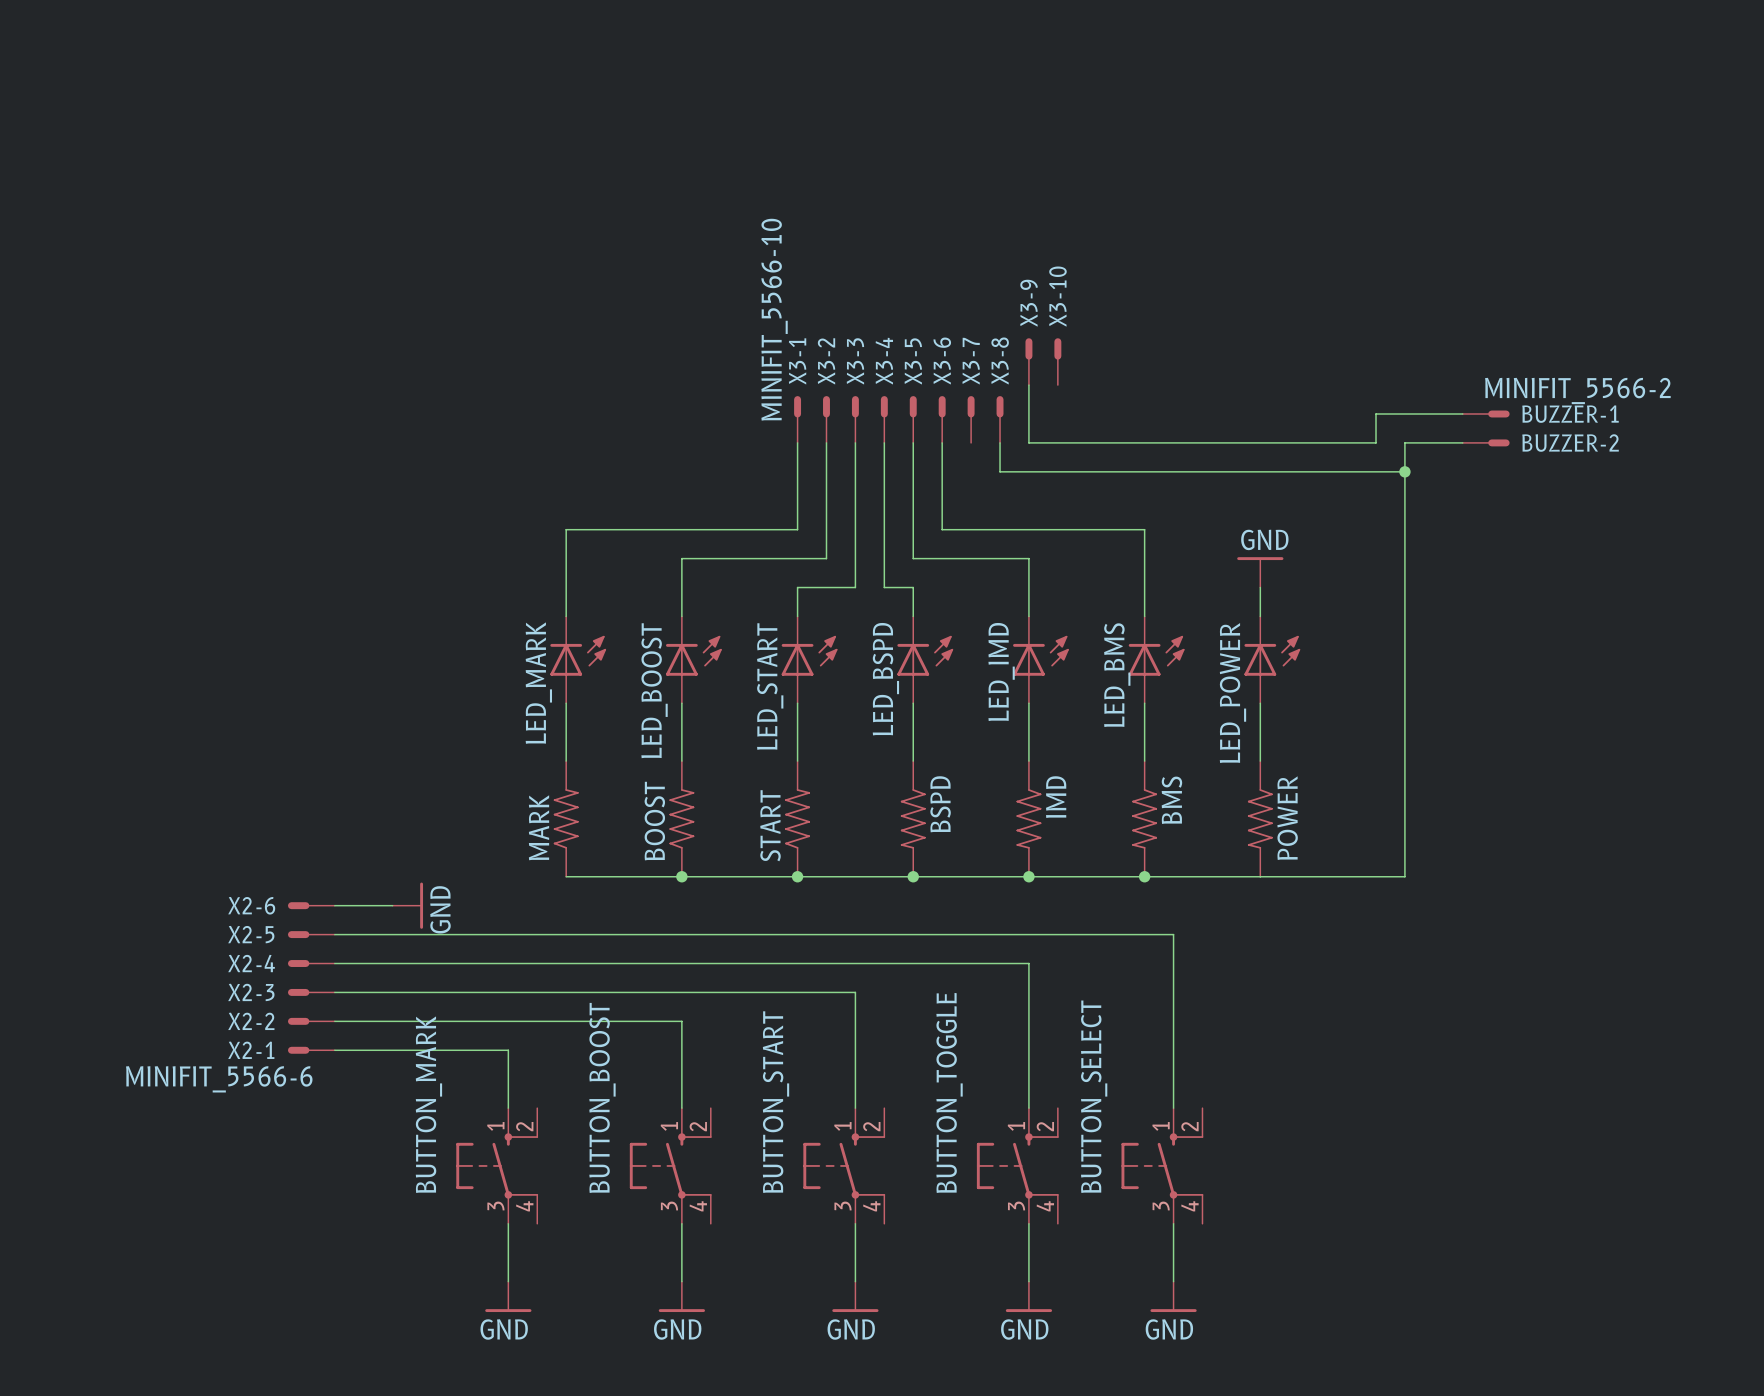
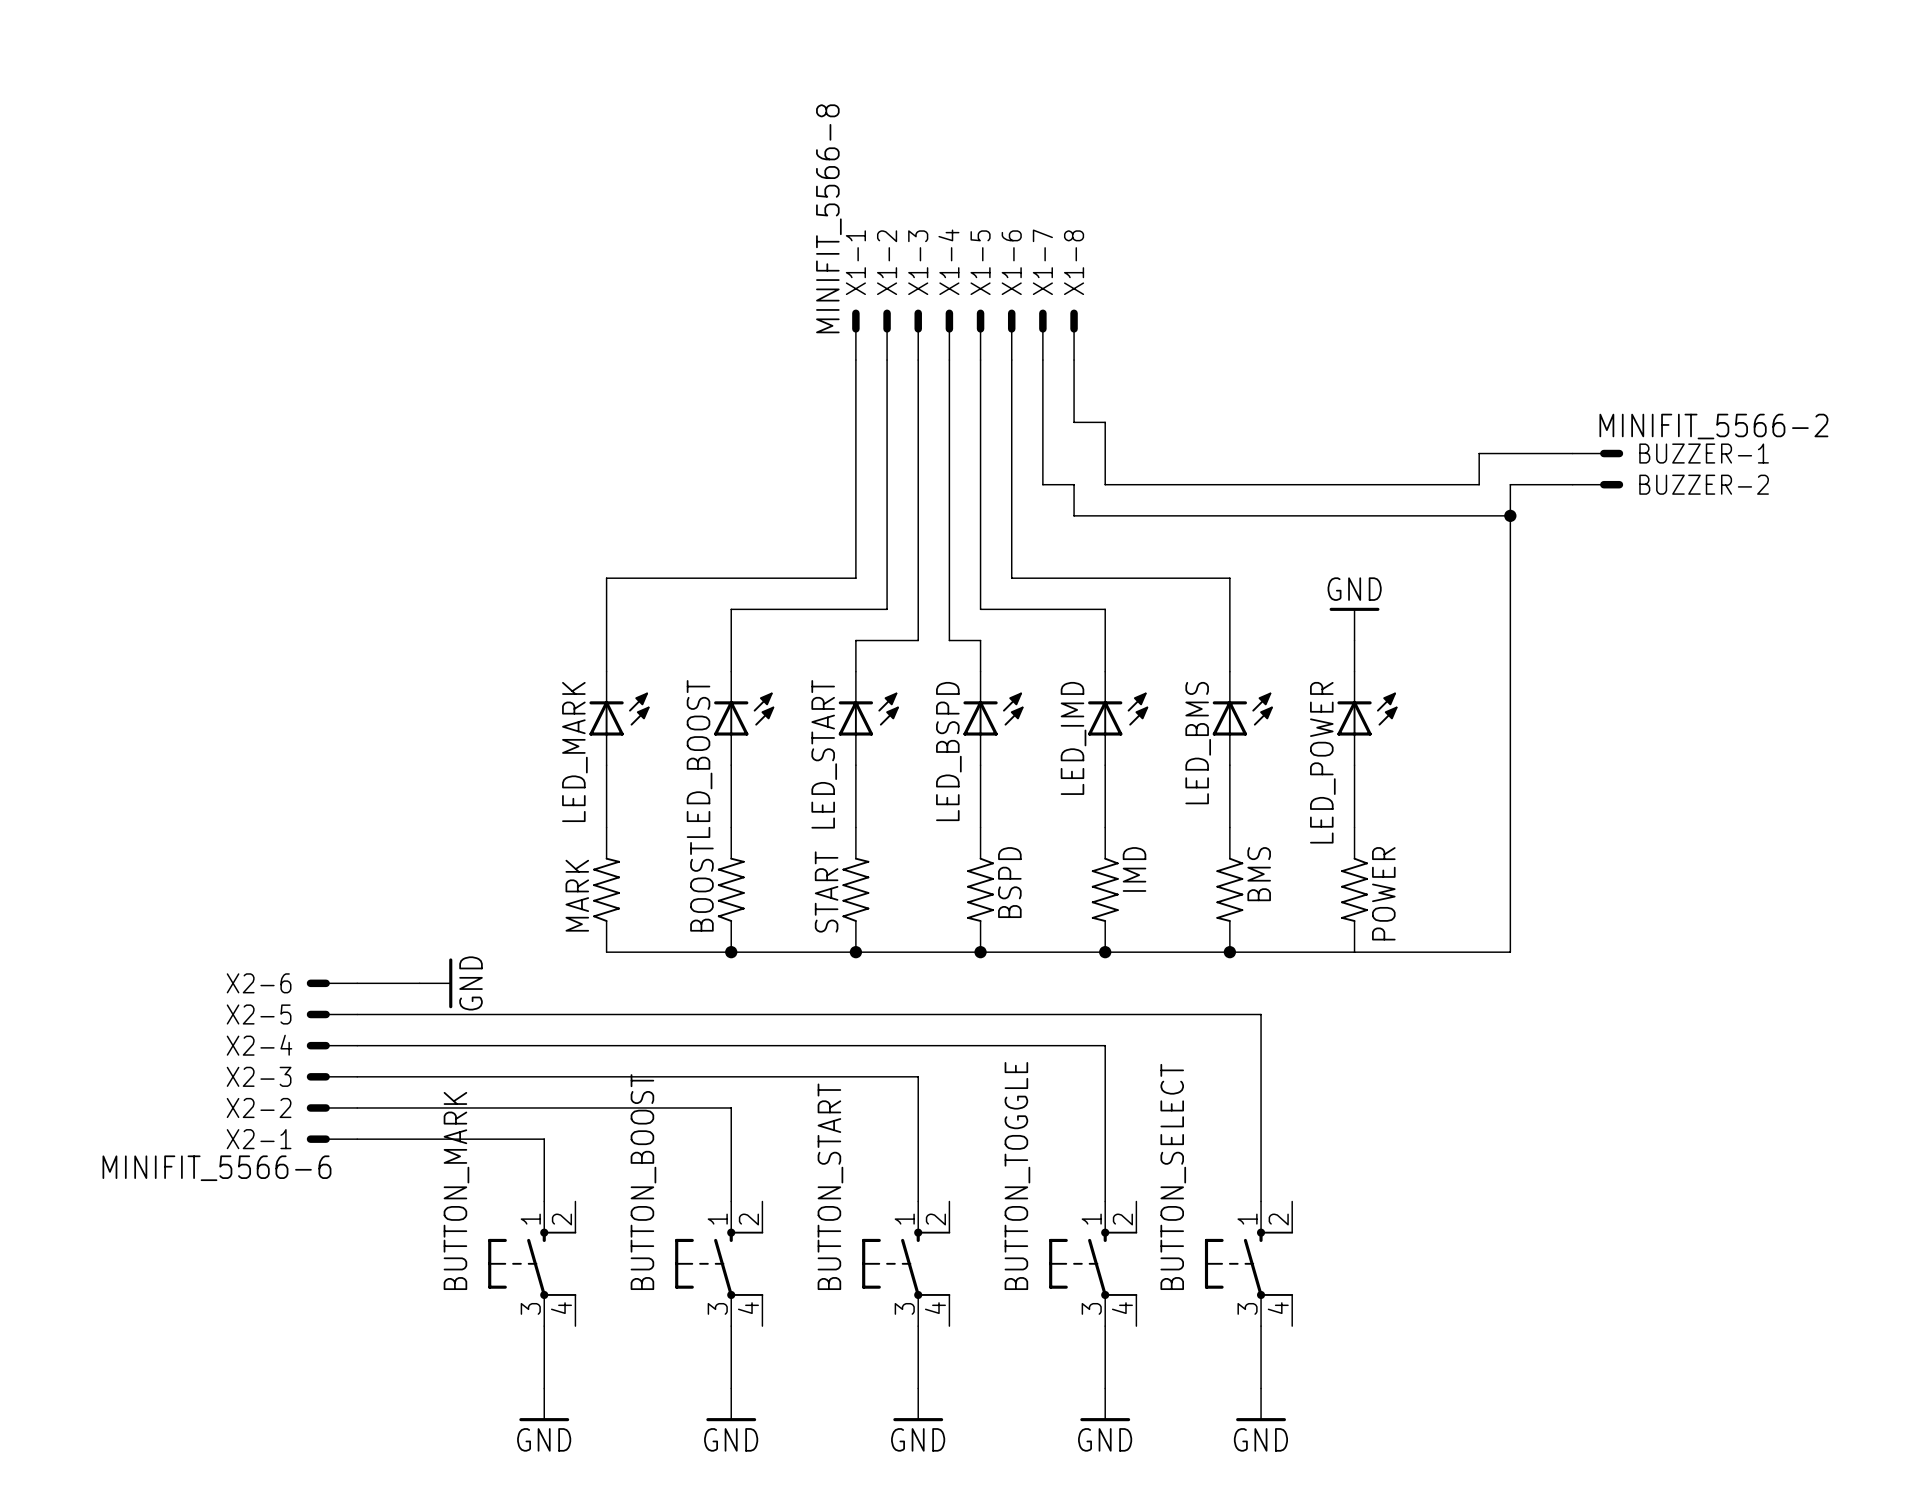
X1-1: none -> MINIFIT_5566-8 (855, 334)
X1-2: none -> (887, 334)
X1-3: none -> (918, 334)
X1-4: none -> (949, 334)
X1-5: none -> (980, 334)
X1-6: none -> (1011, 334)
X1-7: none -> (1042, 334)
X1-8: none -> (1074, 334)
wire: none -> (855, 360) (855, 484)
wire: none -> (887, 360) (887, 484)
wire: none -> (918, 360) (918, 484)
wire: none -> (949, 360) (949, 484)
wire: none -> (980, 360) (980, 484)
wire: none -> (1011, 360) (1011, 484)
wire: none -> (1042, 360) (1042, 484) (1074, 484)
wire: none -> (1074, 360) (1074, 422) (1105, 422)
X3-9: (1028, 361) -> none
X3-10: (1057, 361) -> none
X3-1: MINIFIT_5566-10 (797, 419) -> none
X3-2: (826, 419) -> none
X3-3: (855, 419) -> none
X3-4: (884, 419) -> none
X3-5: (913, 419) -> none
X3-6: (942, 419) -> none
X3-7: (971, 419) -> none
X3-8: (1000, 419) -> none

